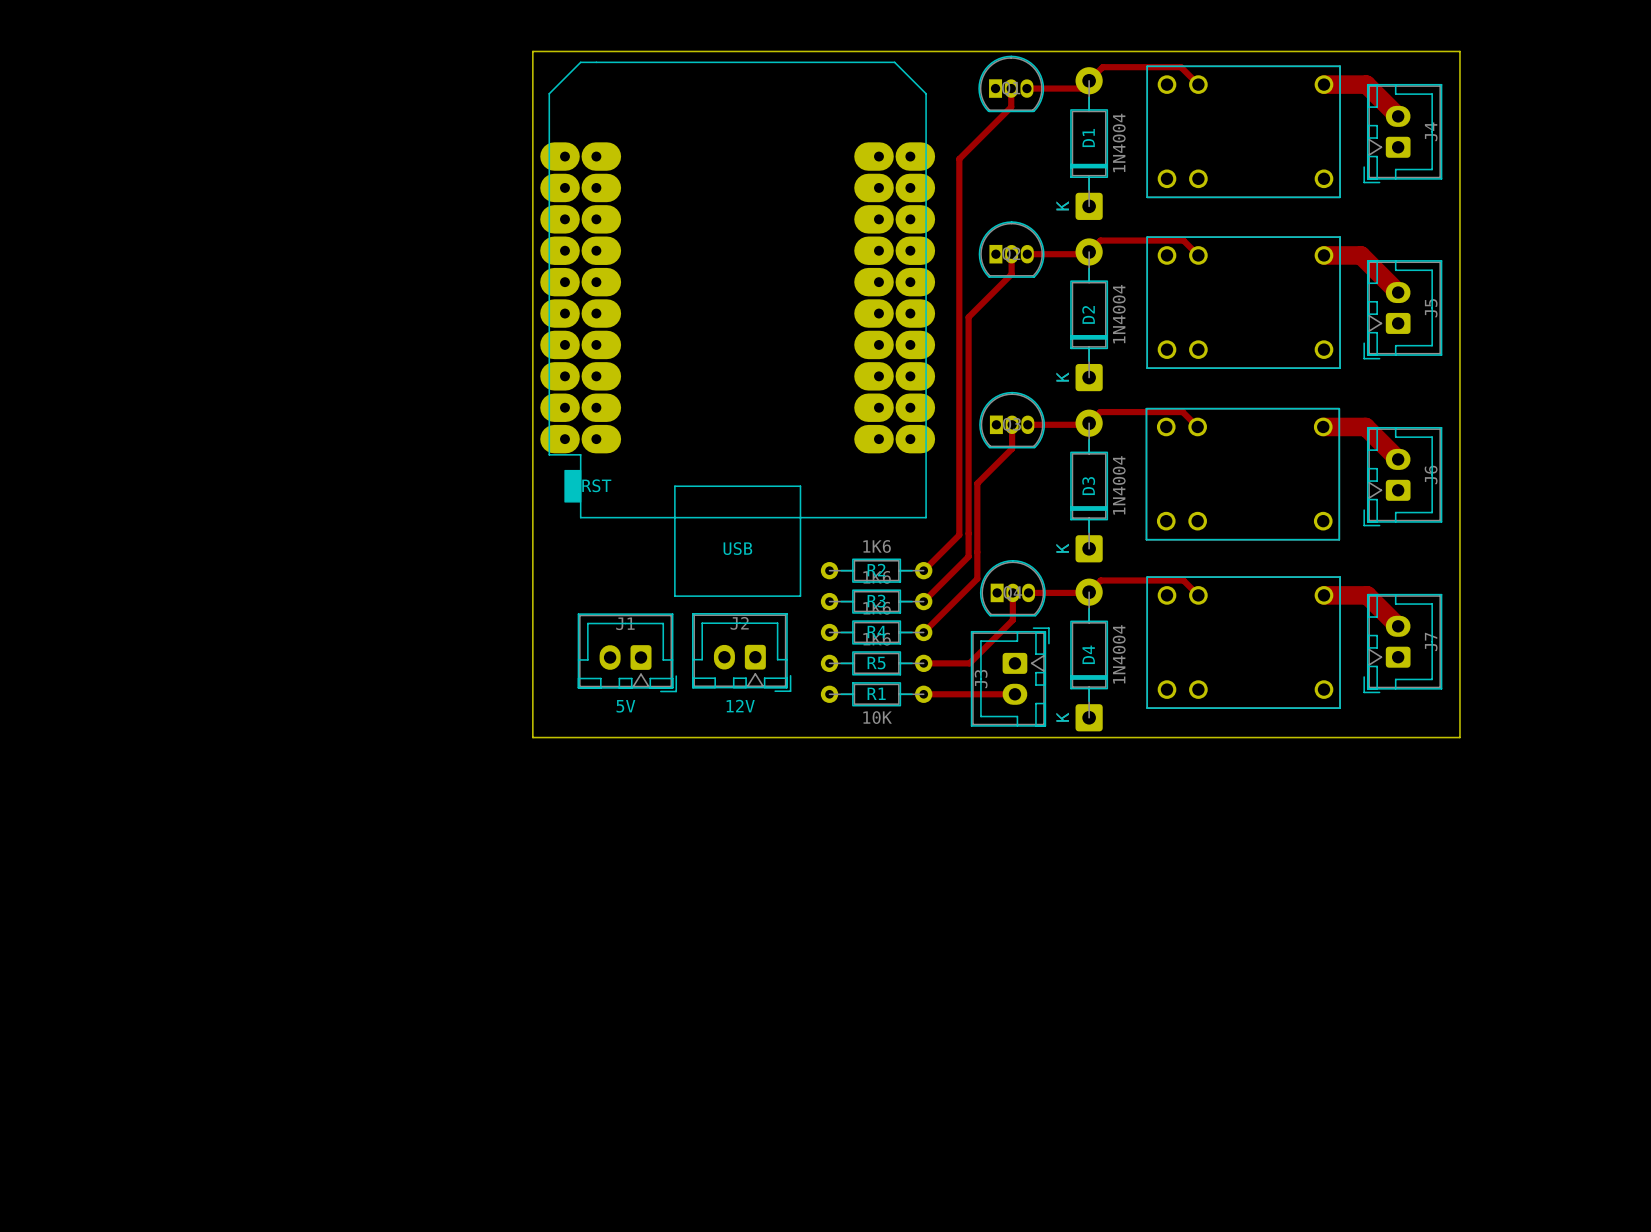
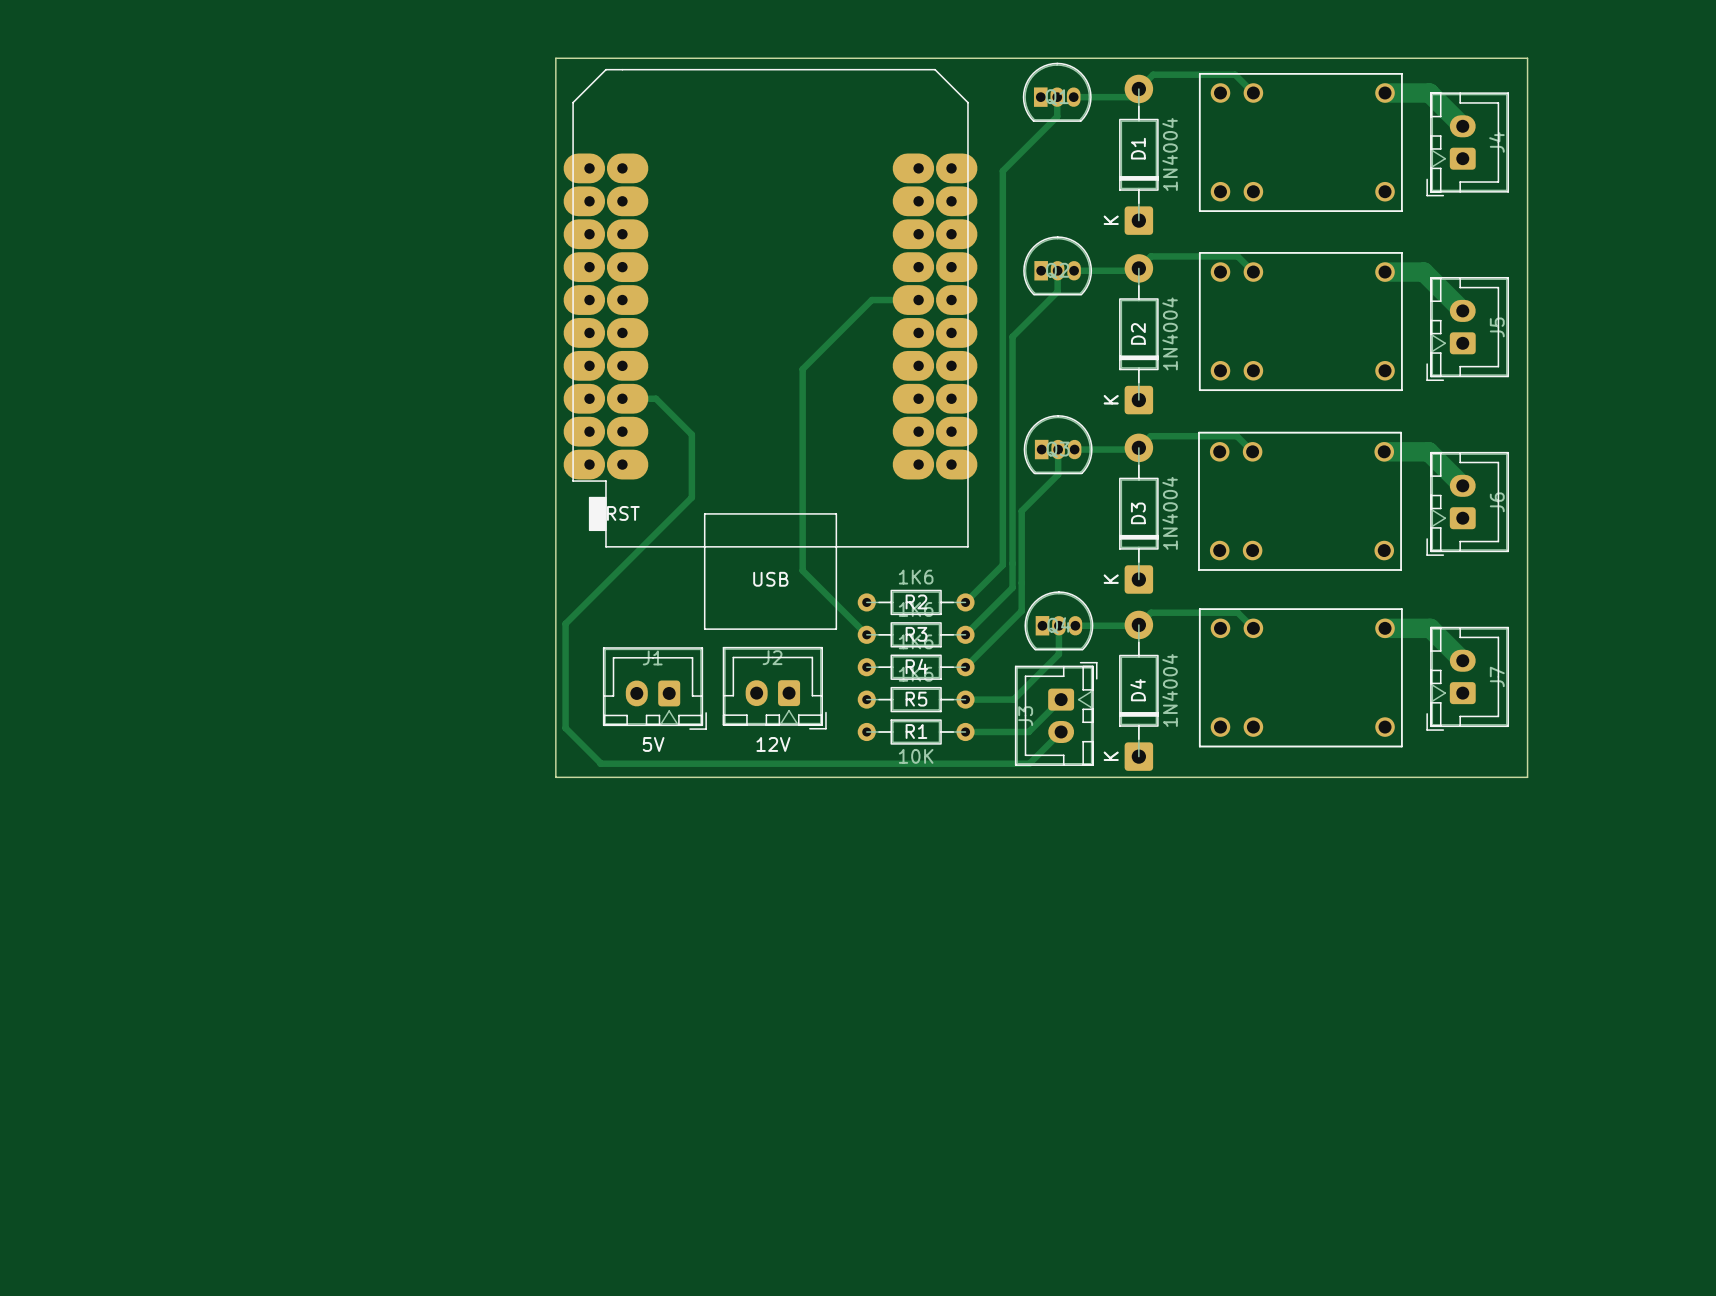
track: none -> (918, 300) (871, 300) (802, 369) (802, 570) (866, 634)
track: none -> (622, 398) (655, 398) (691, 434) (691, 497) (565, 623) (565, 728) (600, 763) (1029, 763) (1061, 731)
track: (984, 694) (1014, 694) -> (1028, 731) (1061, 699)

